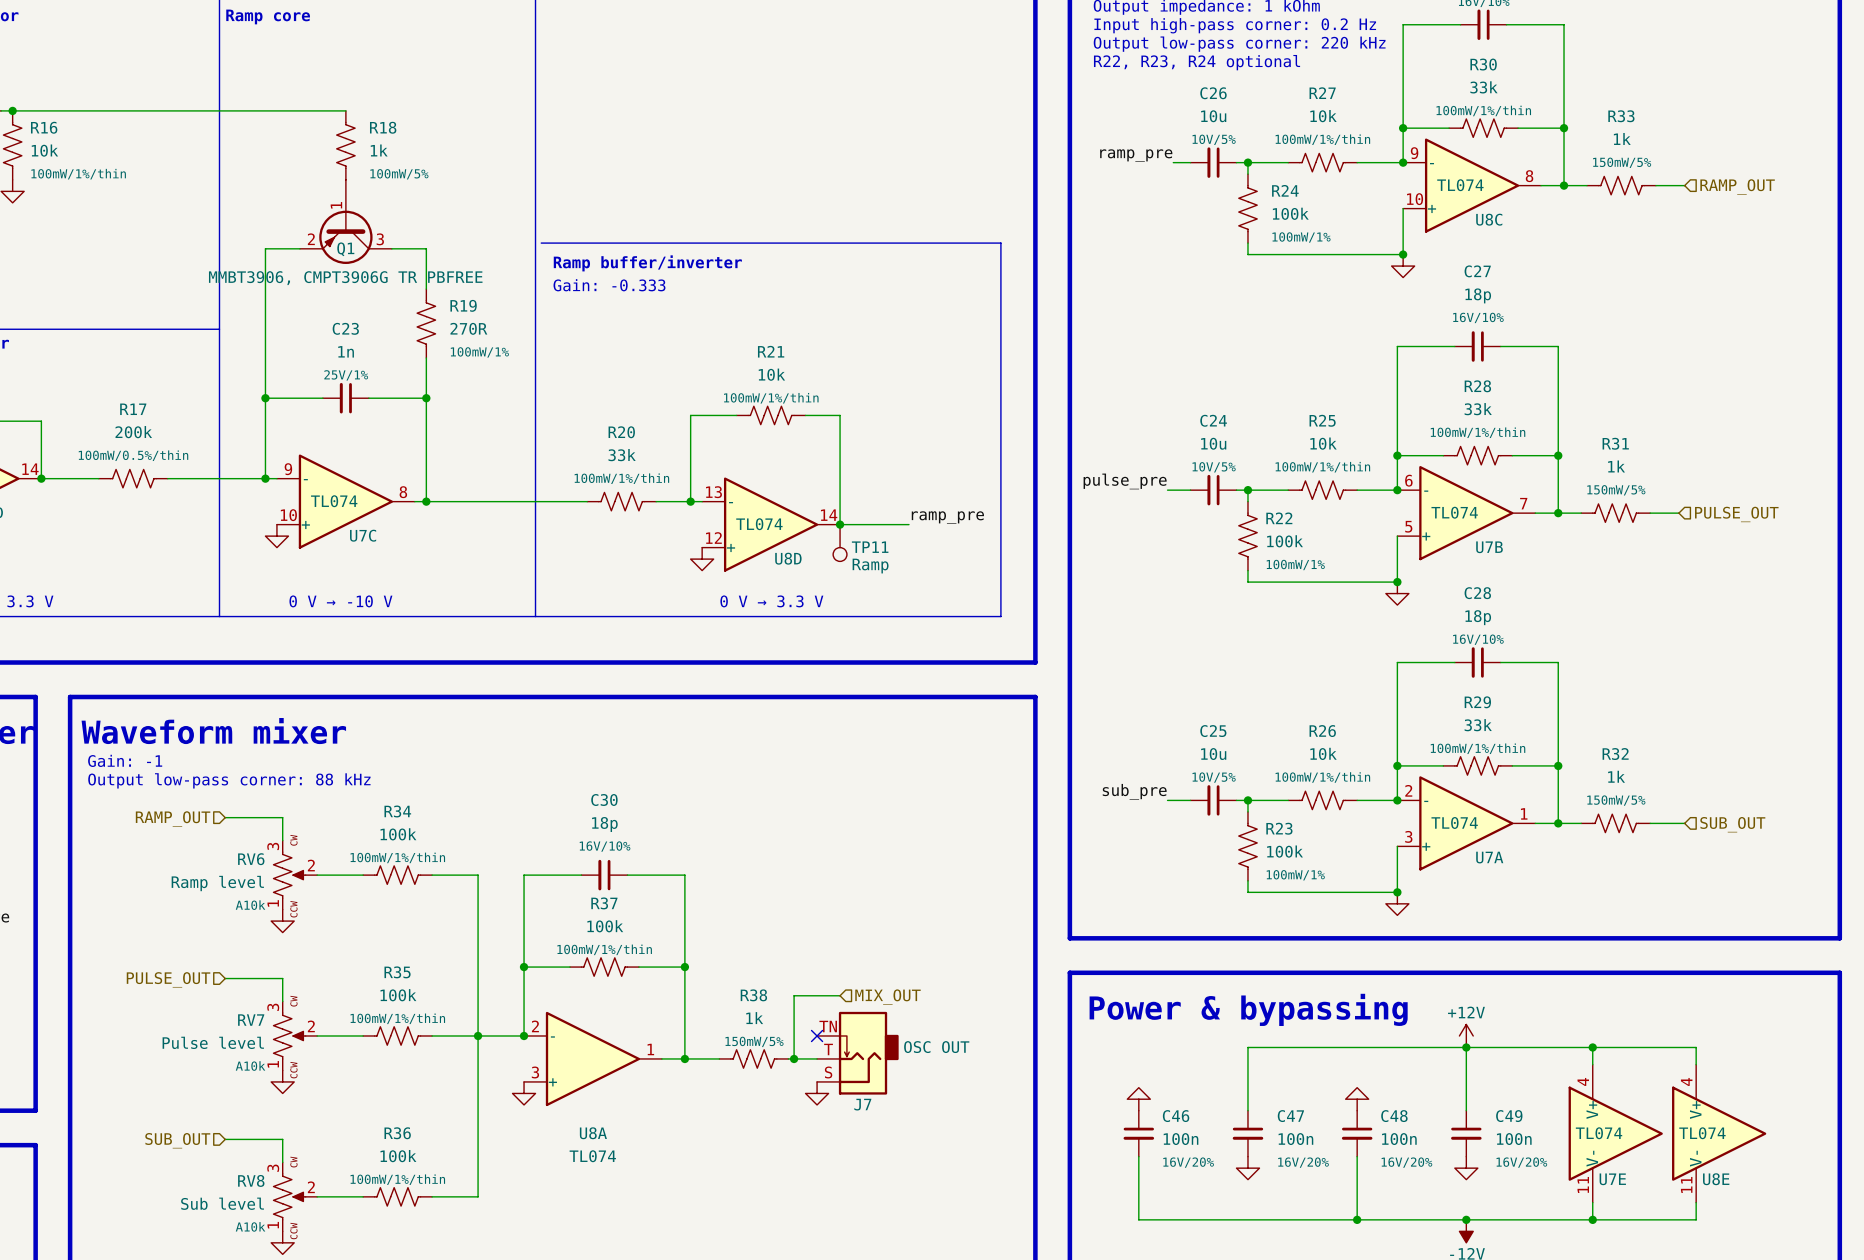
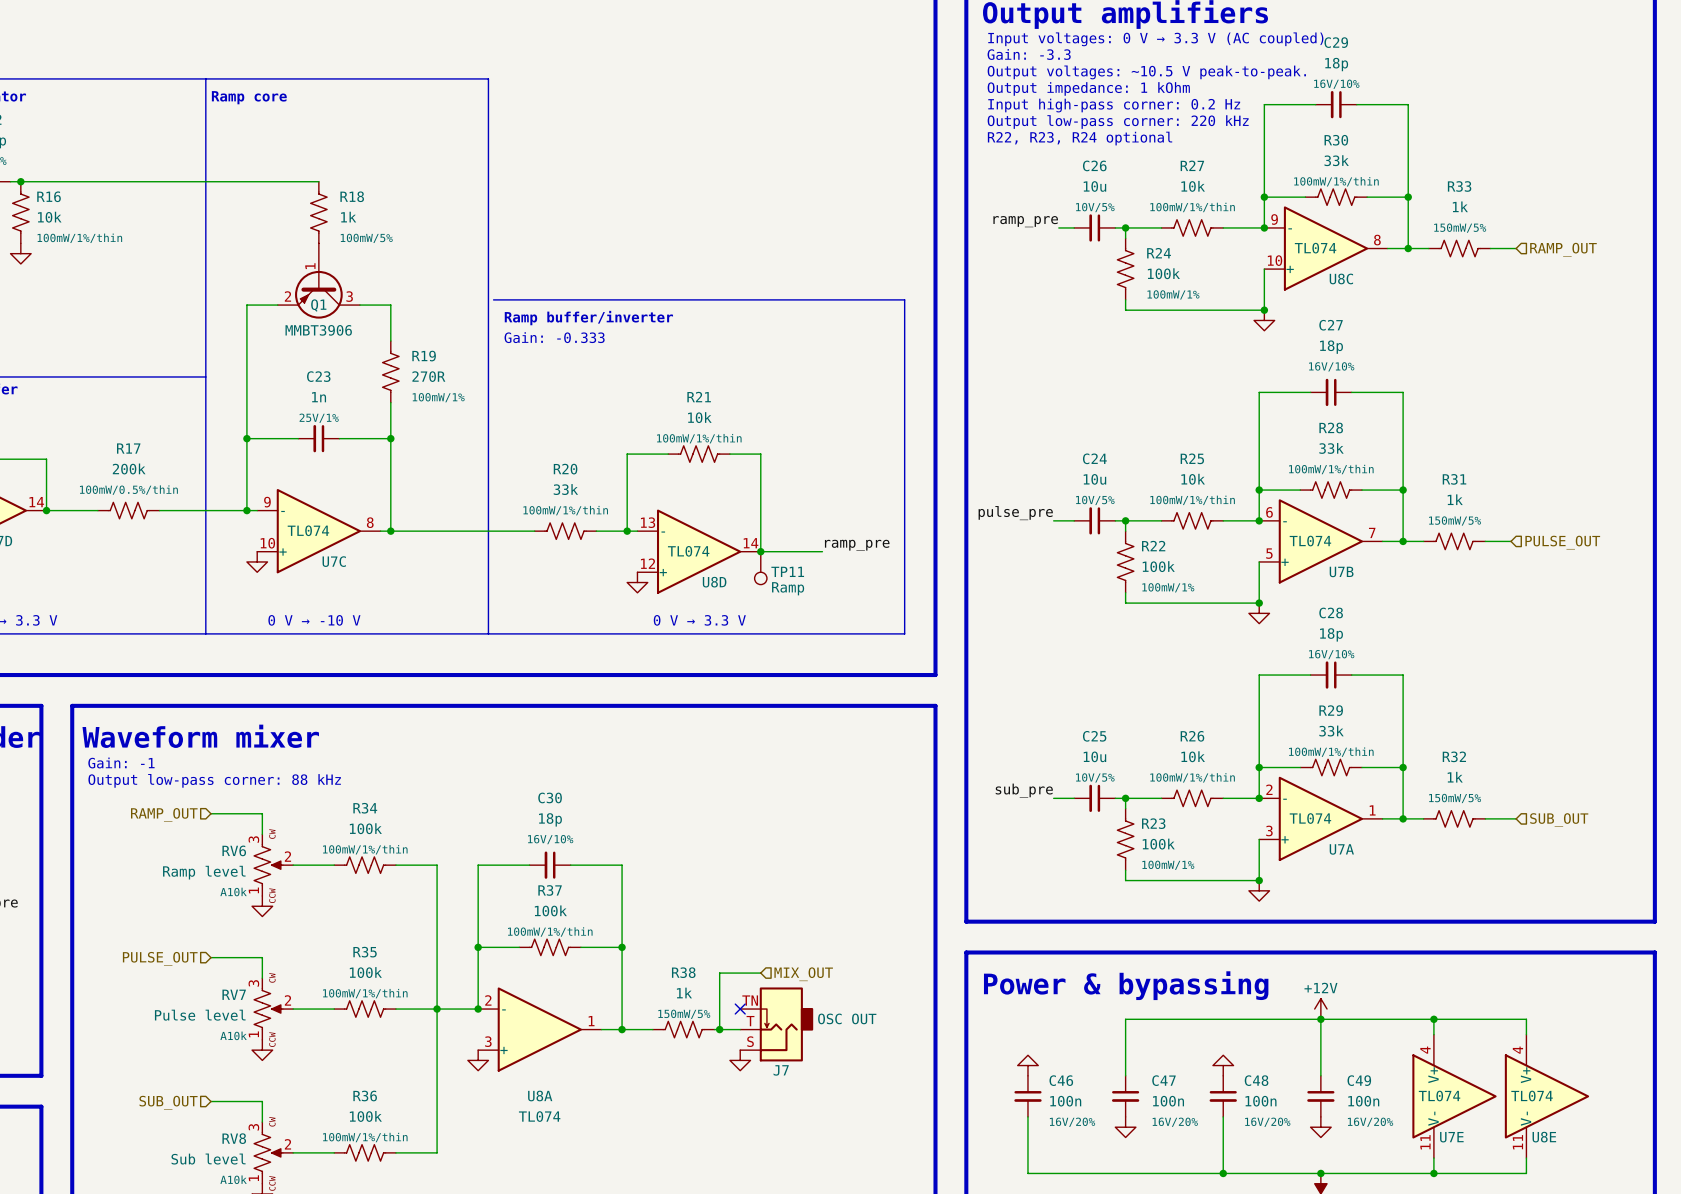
Q1 value: MMBT3906, CMPT3906G TR PBFREE (345, 278) -> MMBT3906 (318, 330)

